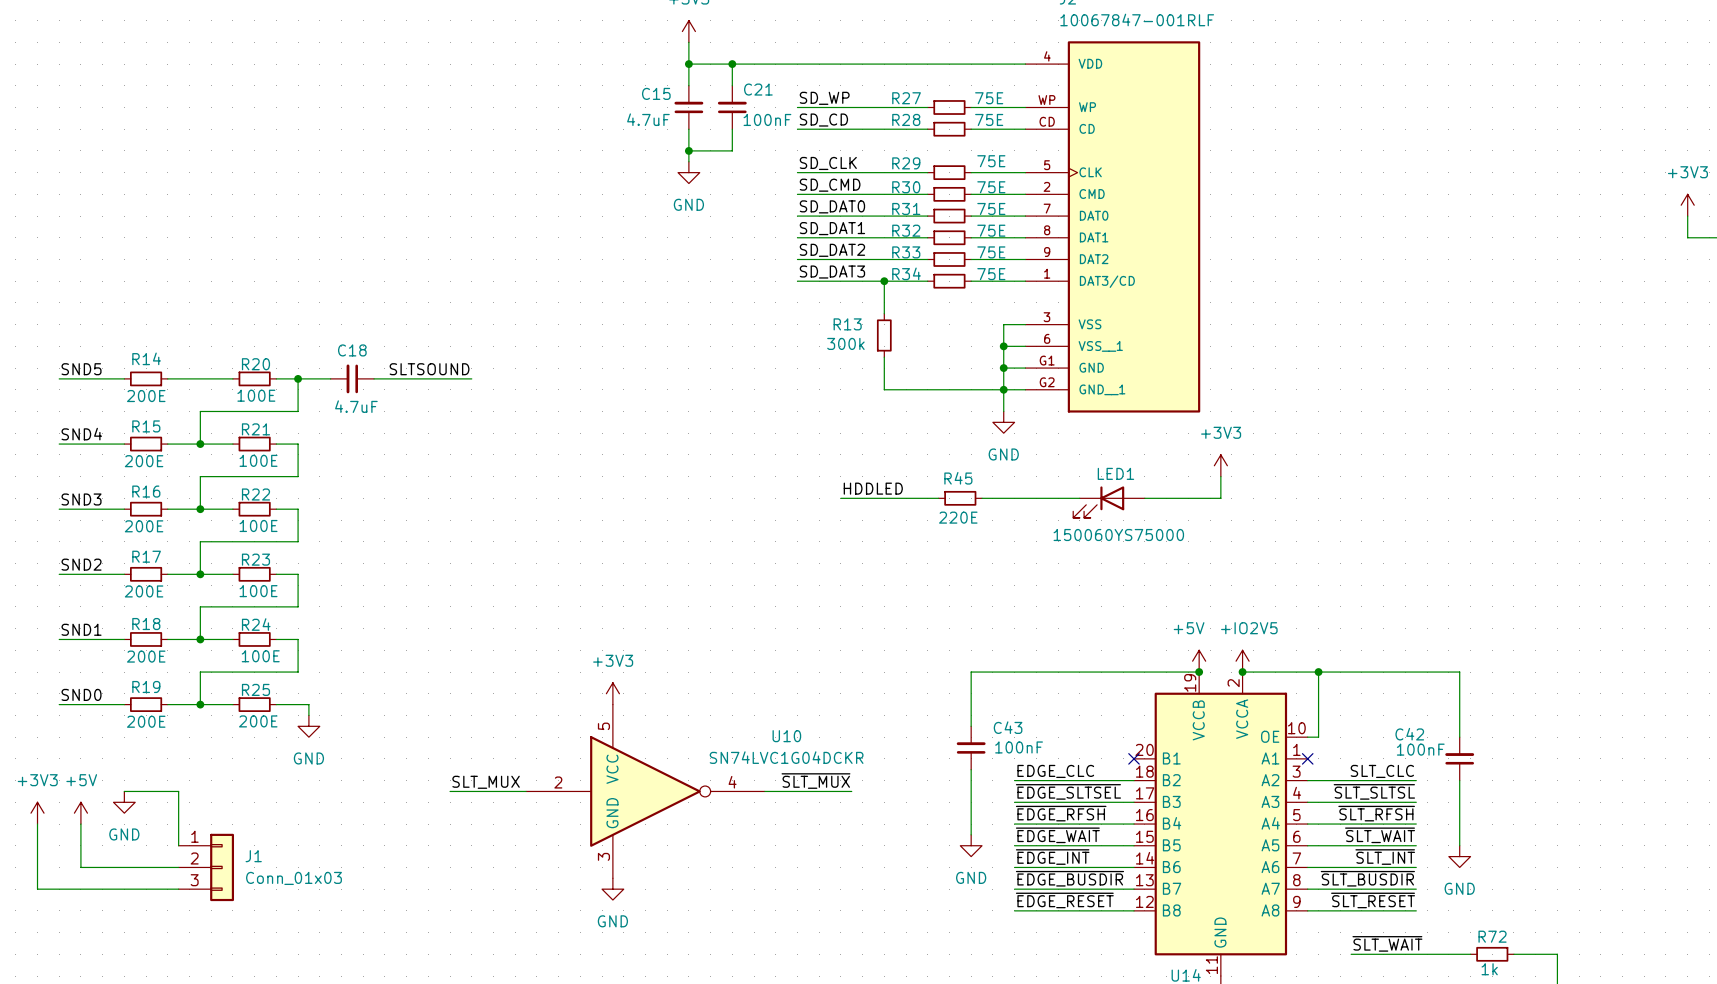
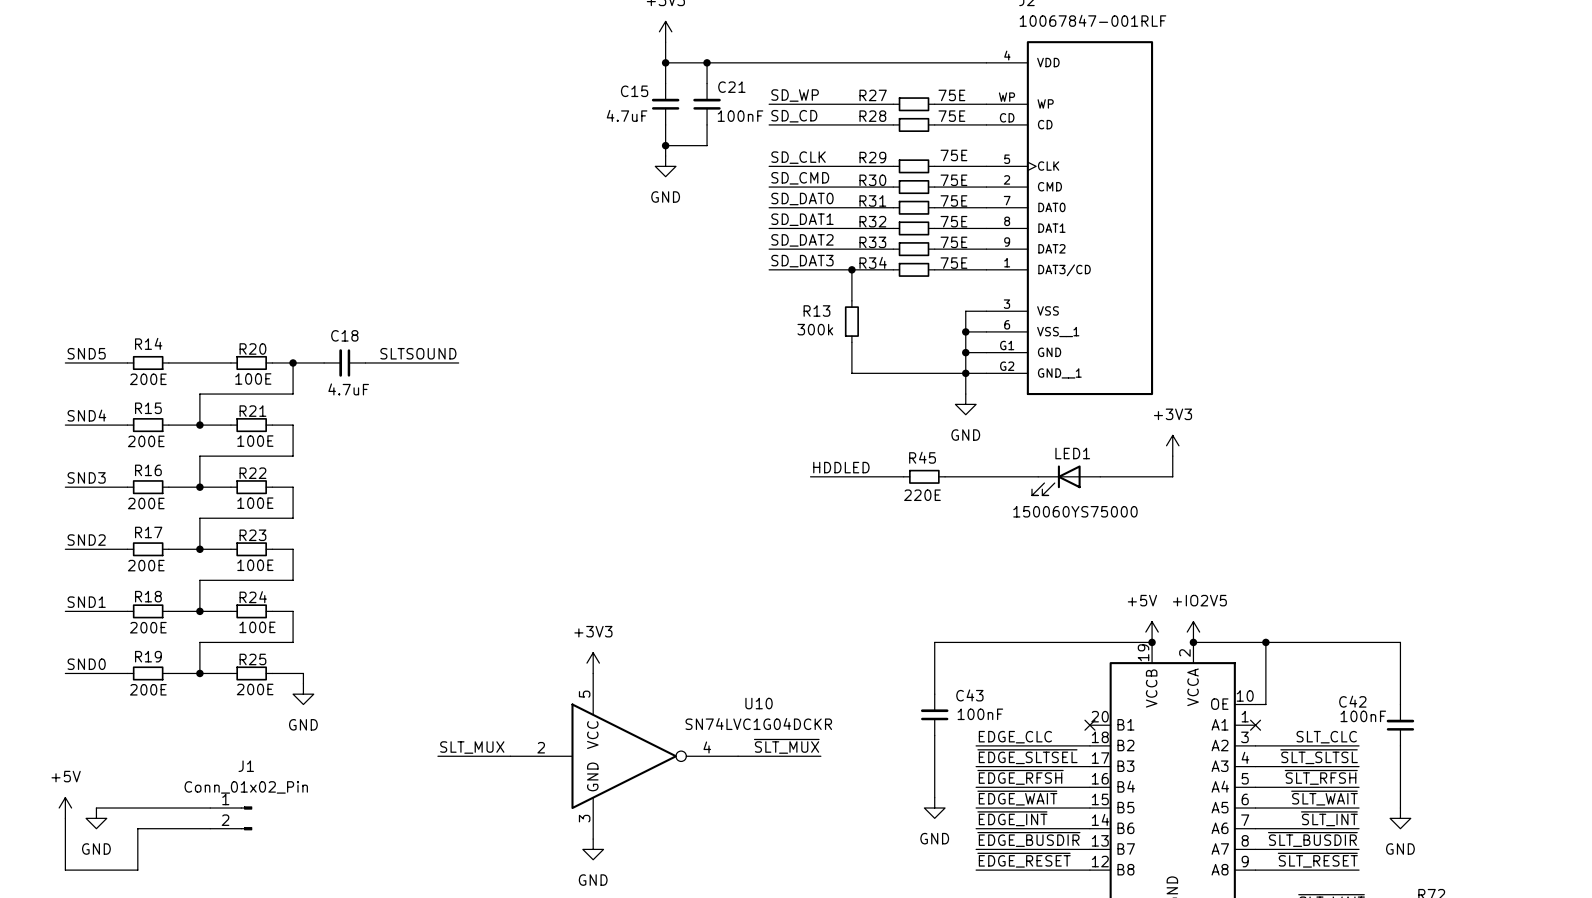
wire: (124, 791) (178, 791) (178, 845) -> none
power symbol position: GND (124, 802) -> GND (96, 818)
power symbol: +3V3 (37, 813) -> none
power symbol position: +5V (80, 813) -> +5V (65, 808)
wire: (37, 824) (37, 889) (178, 889) -> none
wire: (80, 824) (80, 867) (135, 867) -> (65, 818) (65, 870) (137, 870) (137, 828)
J1 symbol: [178, 833, 235, 902] -> [210, 806, 253, 831]
wire: none -> (96, 808) (210, 808)
J1 name position: J1 (253, 856) -> J1 (246, 766)
J1 value: Conn_01x03 (294, 878) -> Conn_01x02_Pin (246, 787)

